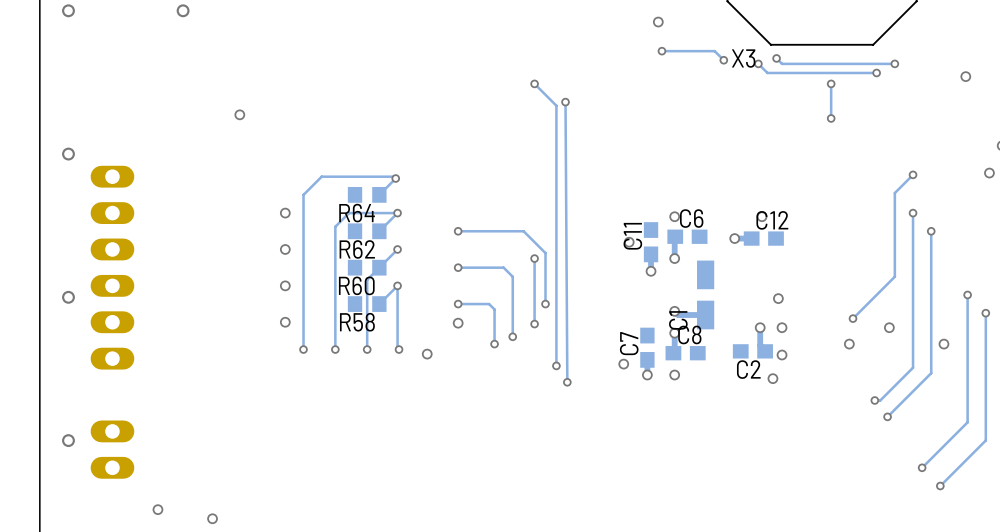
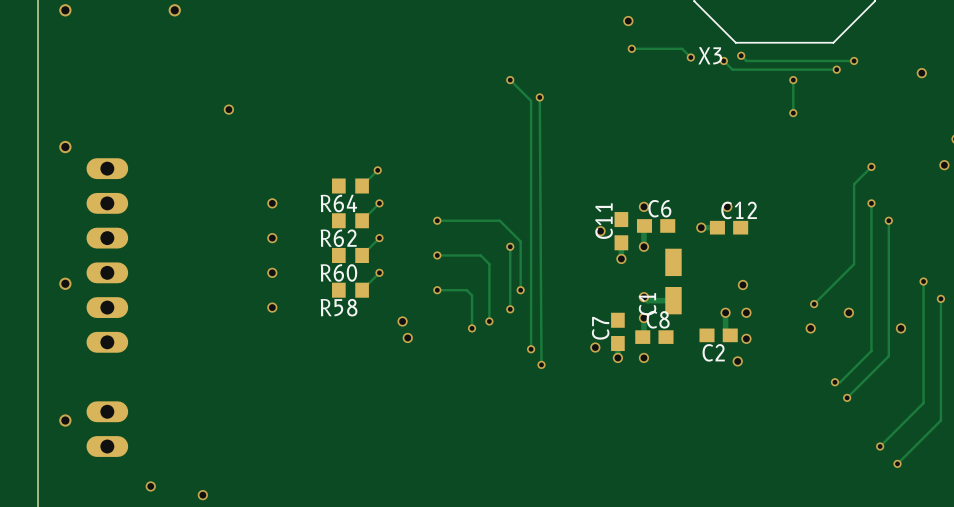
track: (395, 178) (393, 176) (321, 176) (303, 194) (303, 349) -> none
track: (397, 213) (349, 213) (335, 226) (335, 349) -> none
track: (379, 267) (367, 279) (367, 349) -> none
track: (397, 285) (399, 349) -> none
via position: (458, 323) -> (402, 321)
via: (303, 349) -> none
via: (335, 349) -> none
via: (367, 349) -> none
via: (399, 349) -> none

